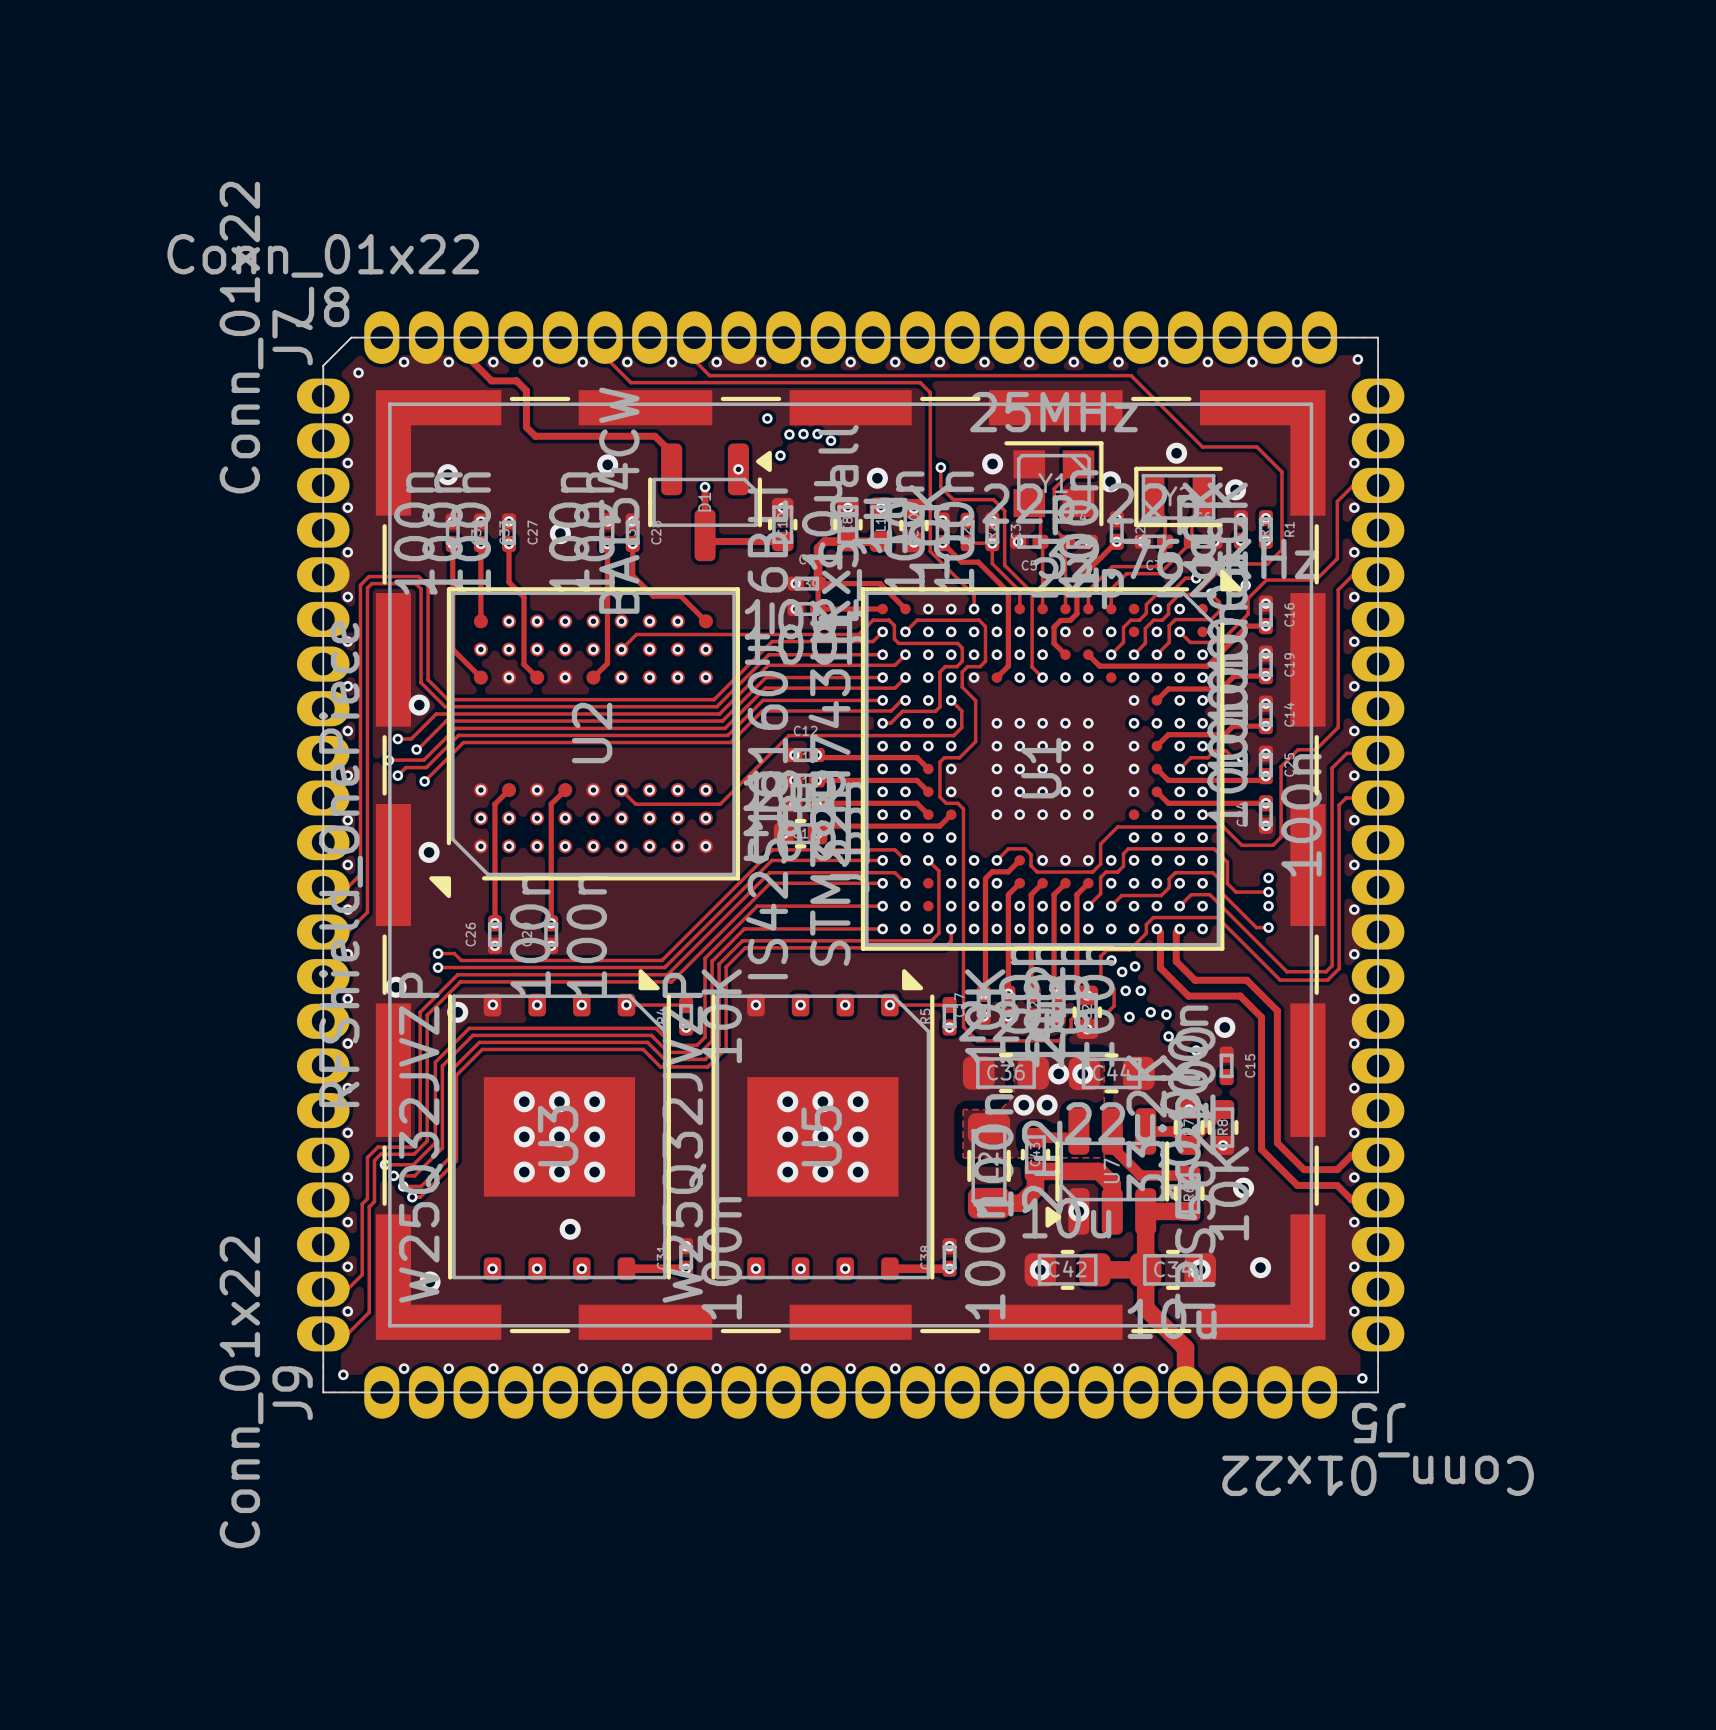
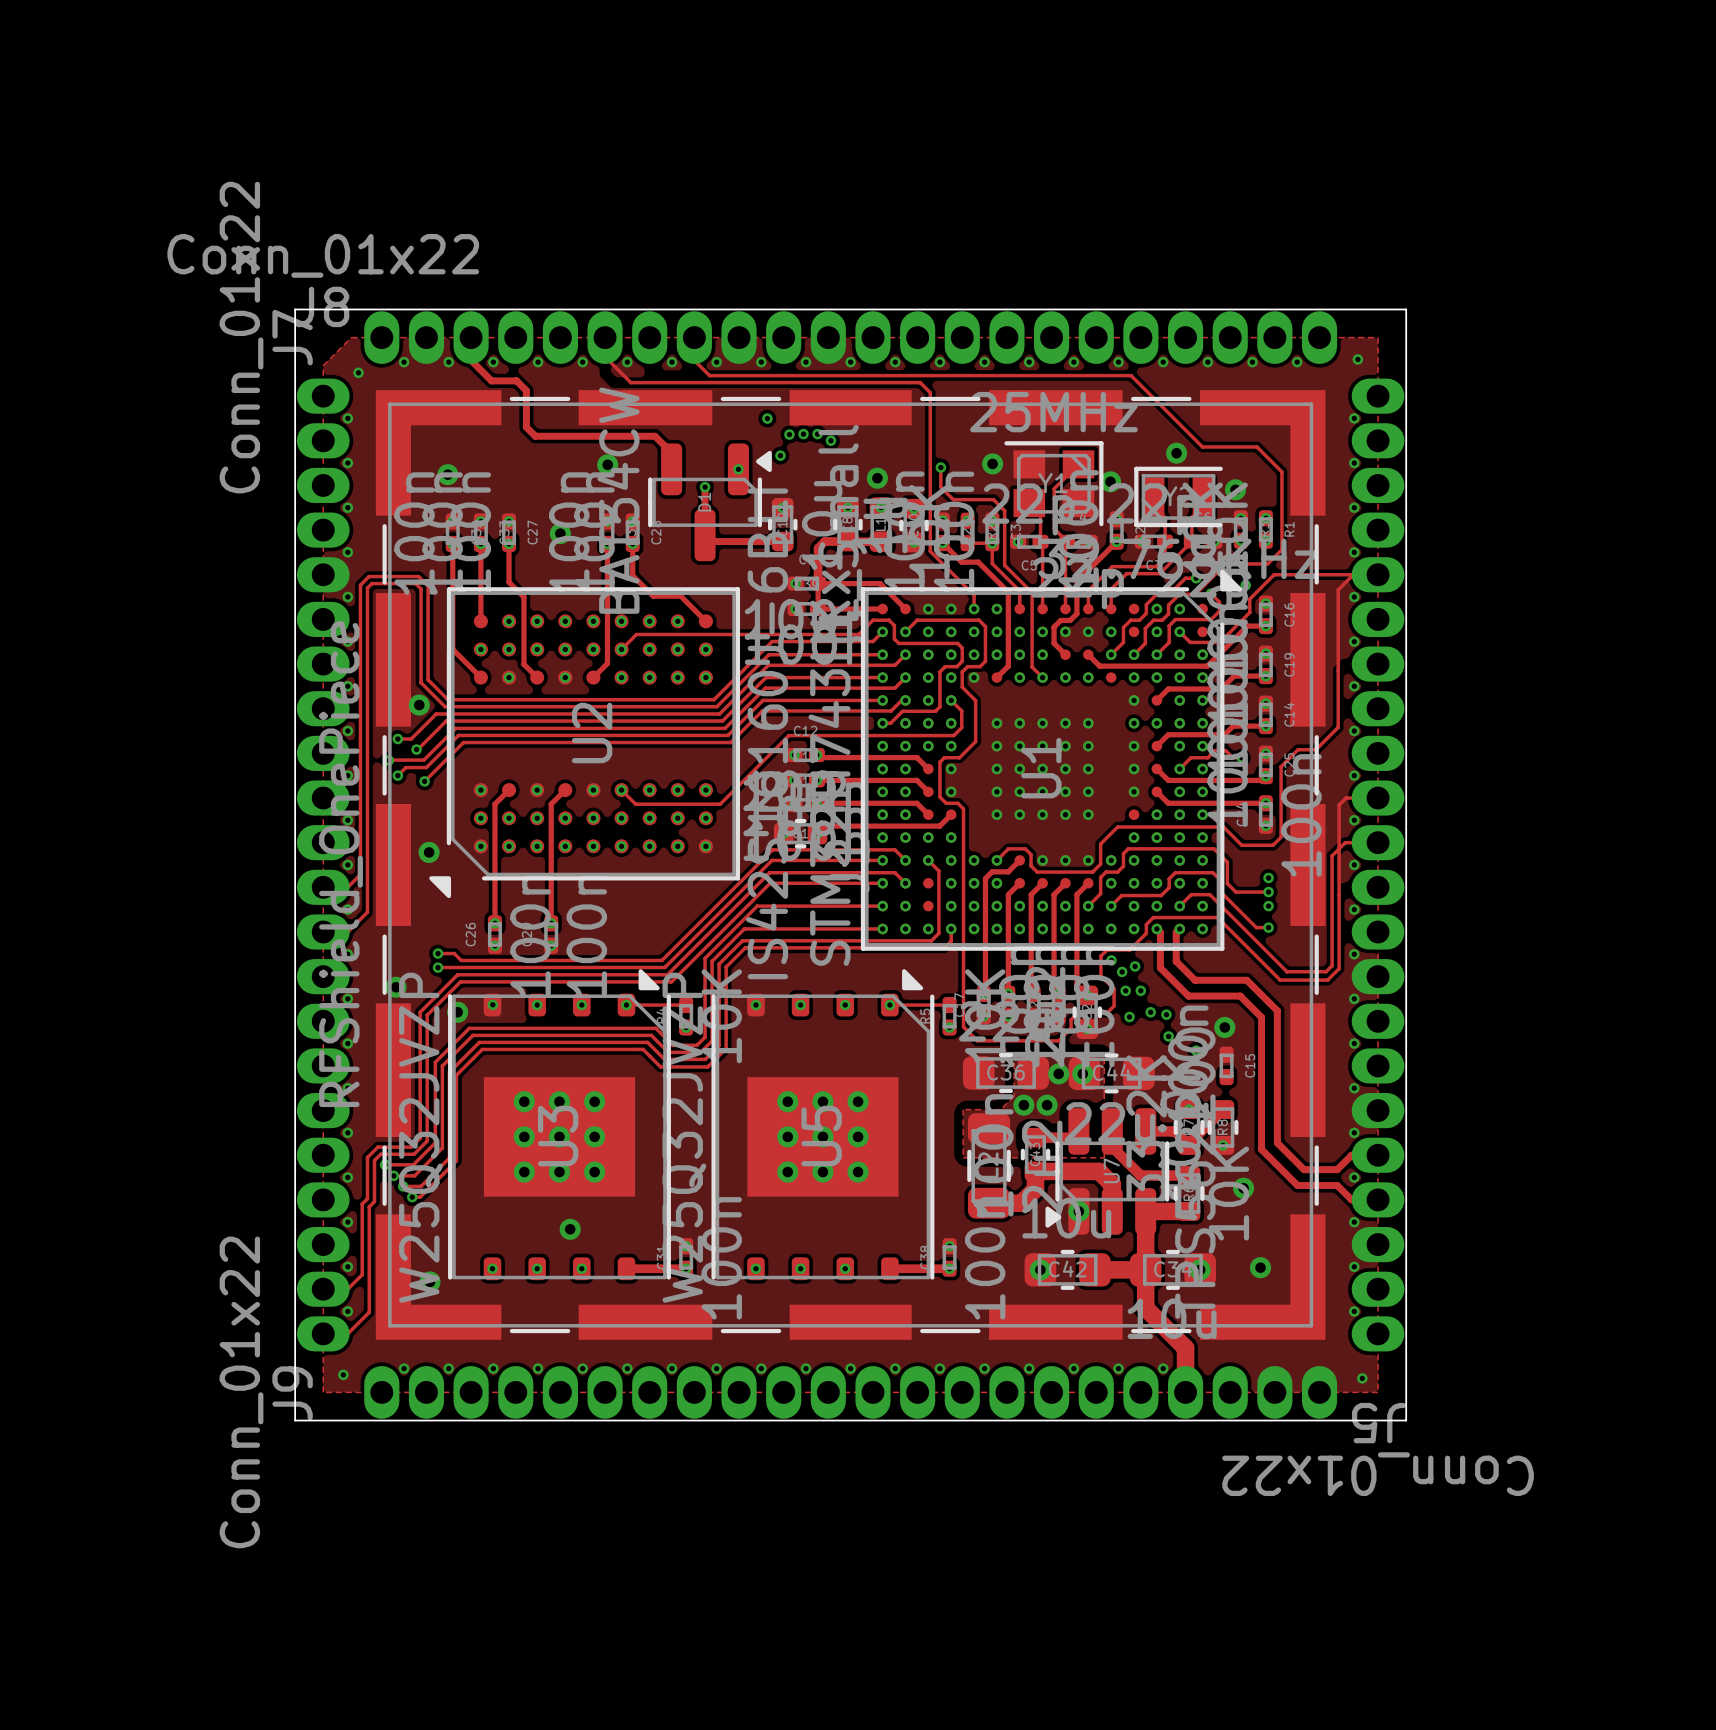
board edge: (351, 337) (323, 365) (323, 1392) (1378, 1392) (1378, 337) (351, 337) -> (295, 309) (295, 1420) (1406, 1420) (1406, 309) (295, 309)
track: (1378, 485) (1353, 485) (1337, 501) (1337, 558) (1315, 580) (1266, 580) (1248, 598) (1248, 614) -> (1353, 574) (1274, 574) (1249, 599) (1249, 612) (1248, 614)
track: (1378, 753) (1346, 753) (1332, 768) (1332, 855) -> (1378, 842) (1345, 842) (1332, 855)

